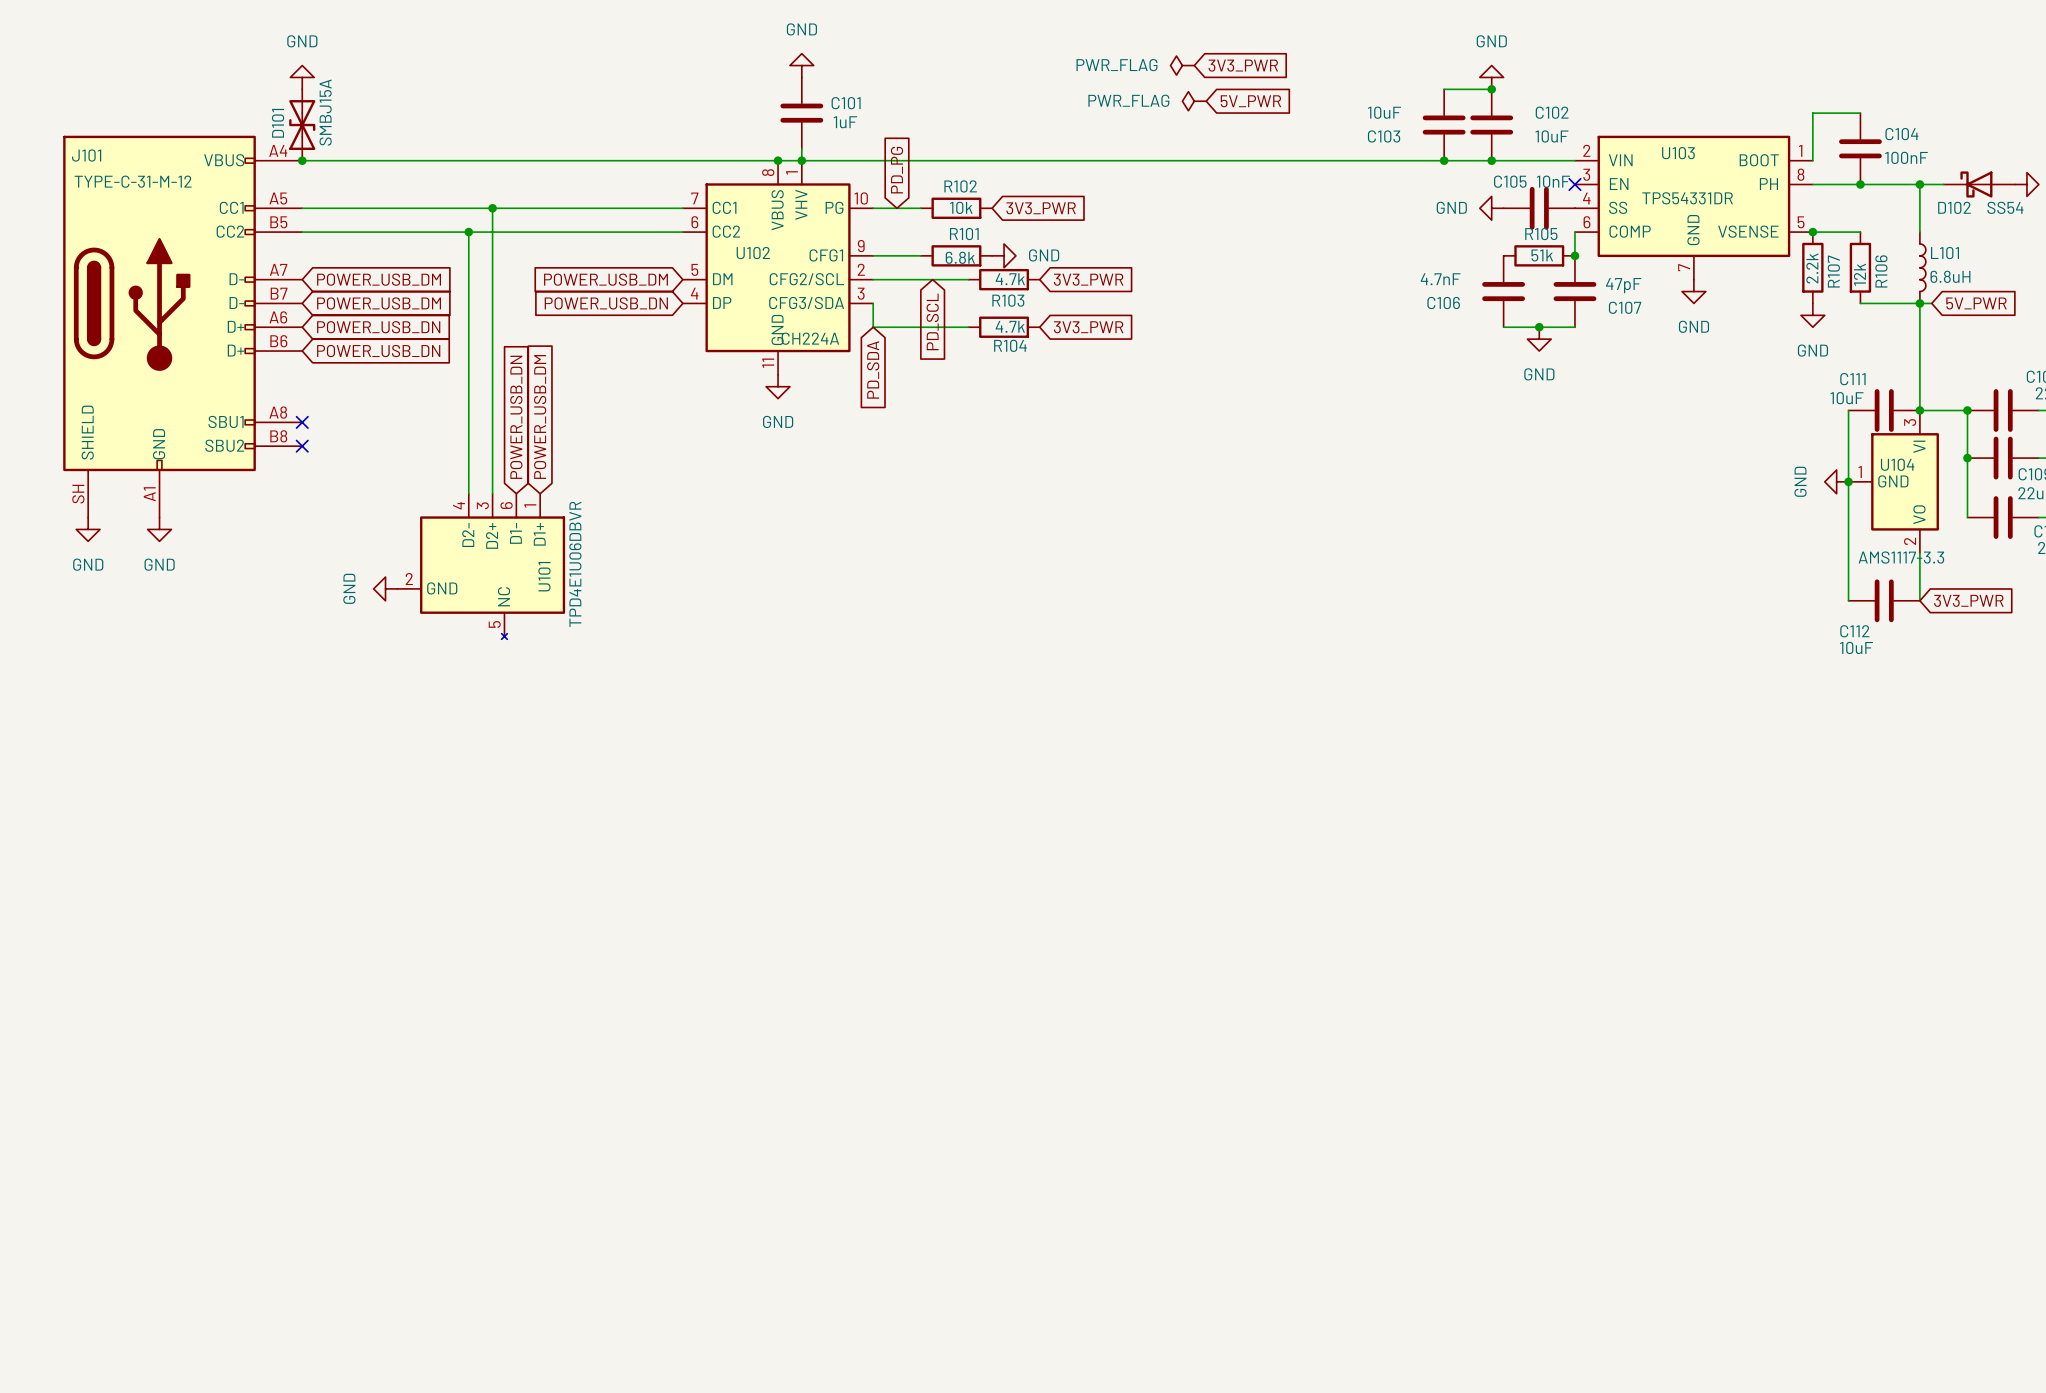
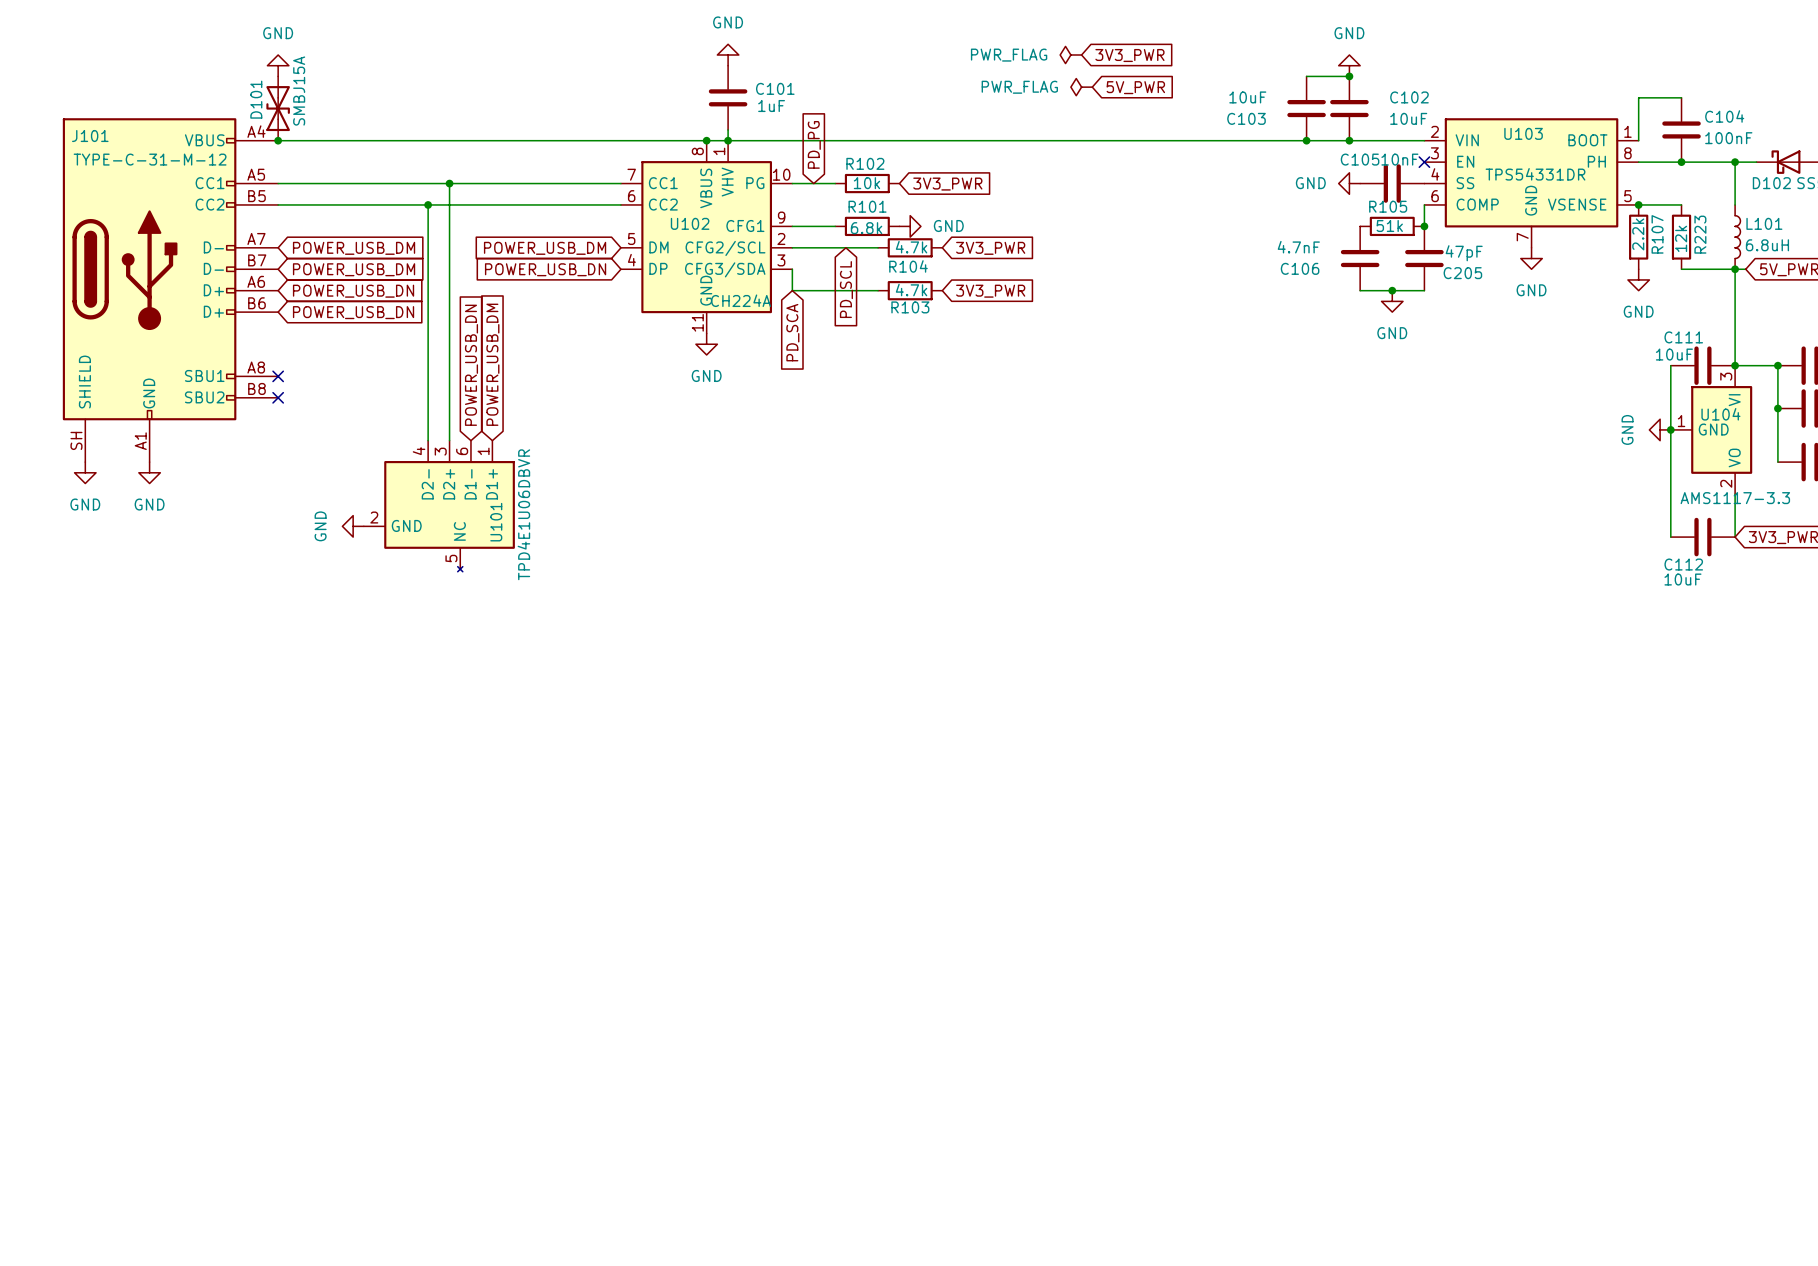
R106 name: R106 (1881, 271) -> R223 (1700, 234)
R103 name: R103 (1008, 300) -> R104 (908, 266)
C107 name: C107 (1625, 307) -> C205 (1462, 273)
R104 name: R104 (1010, 345) -> R103 (910, 307)
global label: PD_SDA (873, 369) -> PD_SCA (792, 332)

